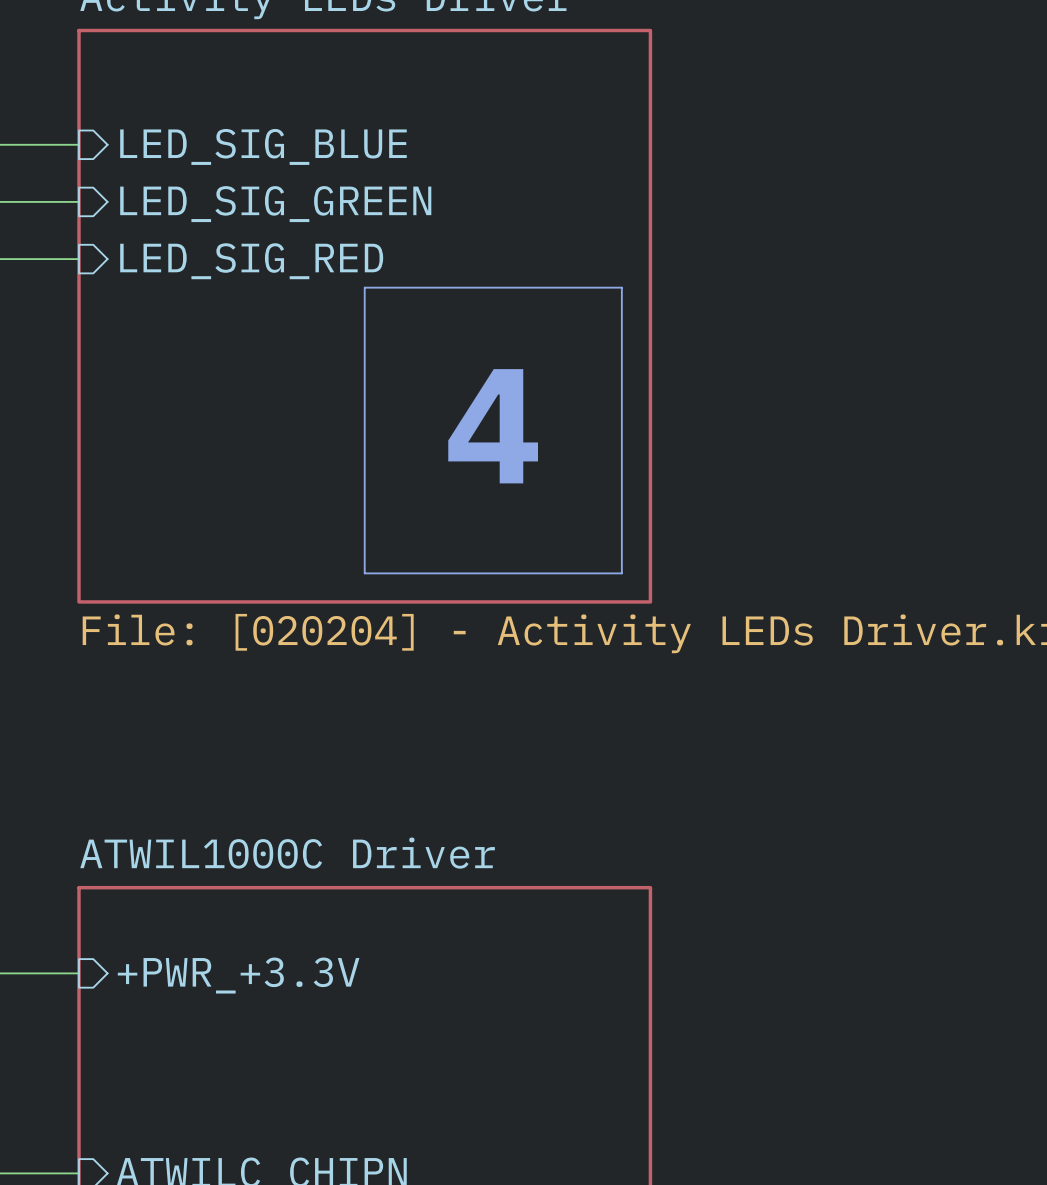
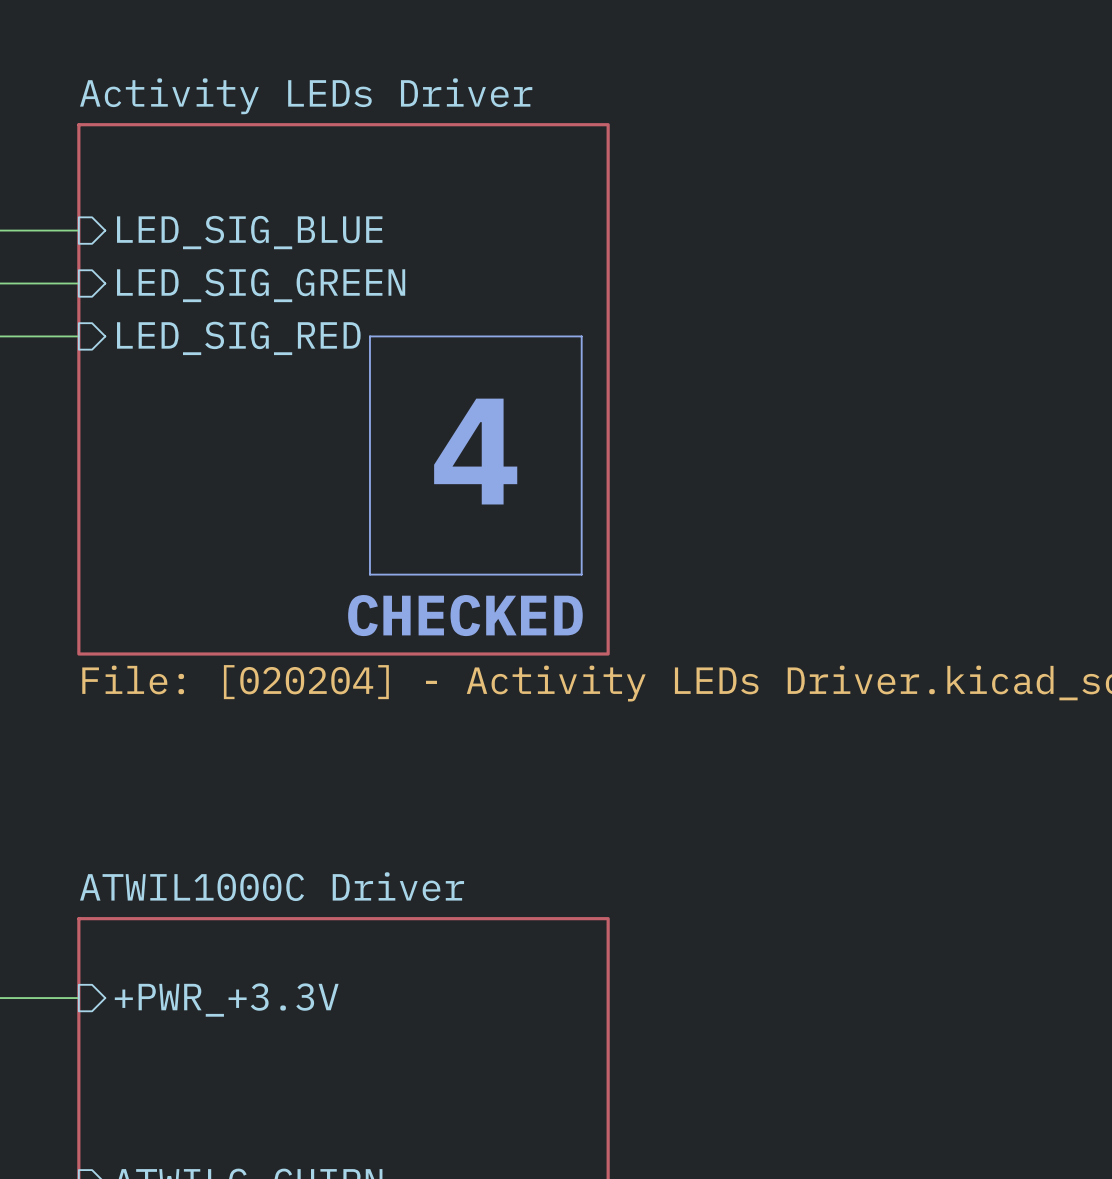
line: (621, 287) (364, 287) (364, 573) (621, 573) (621, 516) -> (581, 362) (581, 336) (369, 336) (369, 574) (581, 574)
text position: 4 (493, 426) -> 4 (475, 451)
text: none -> CHECKED (465, 615)

